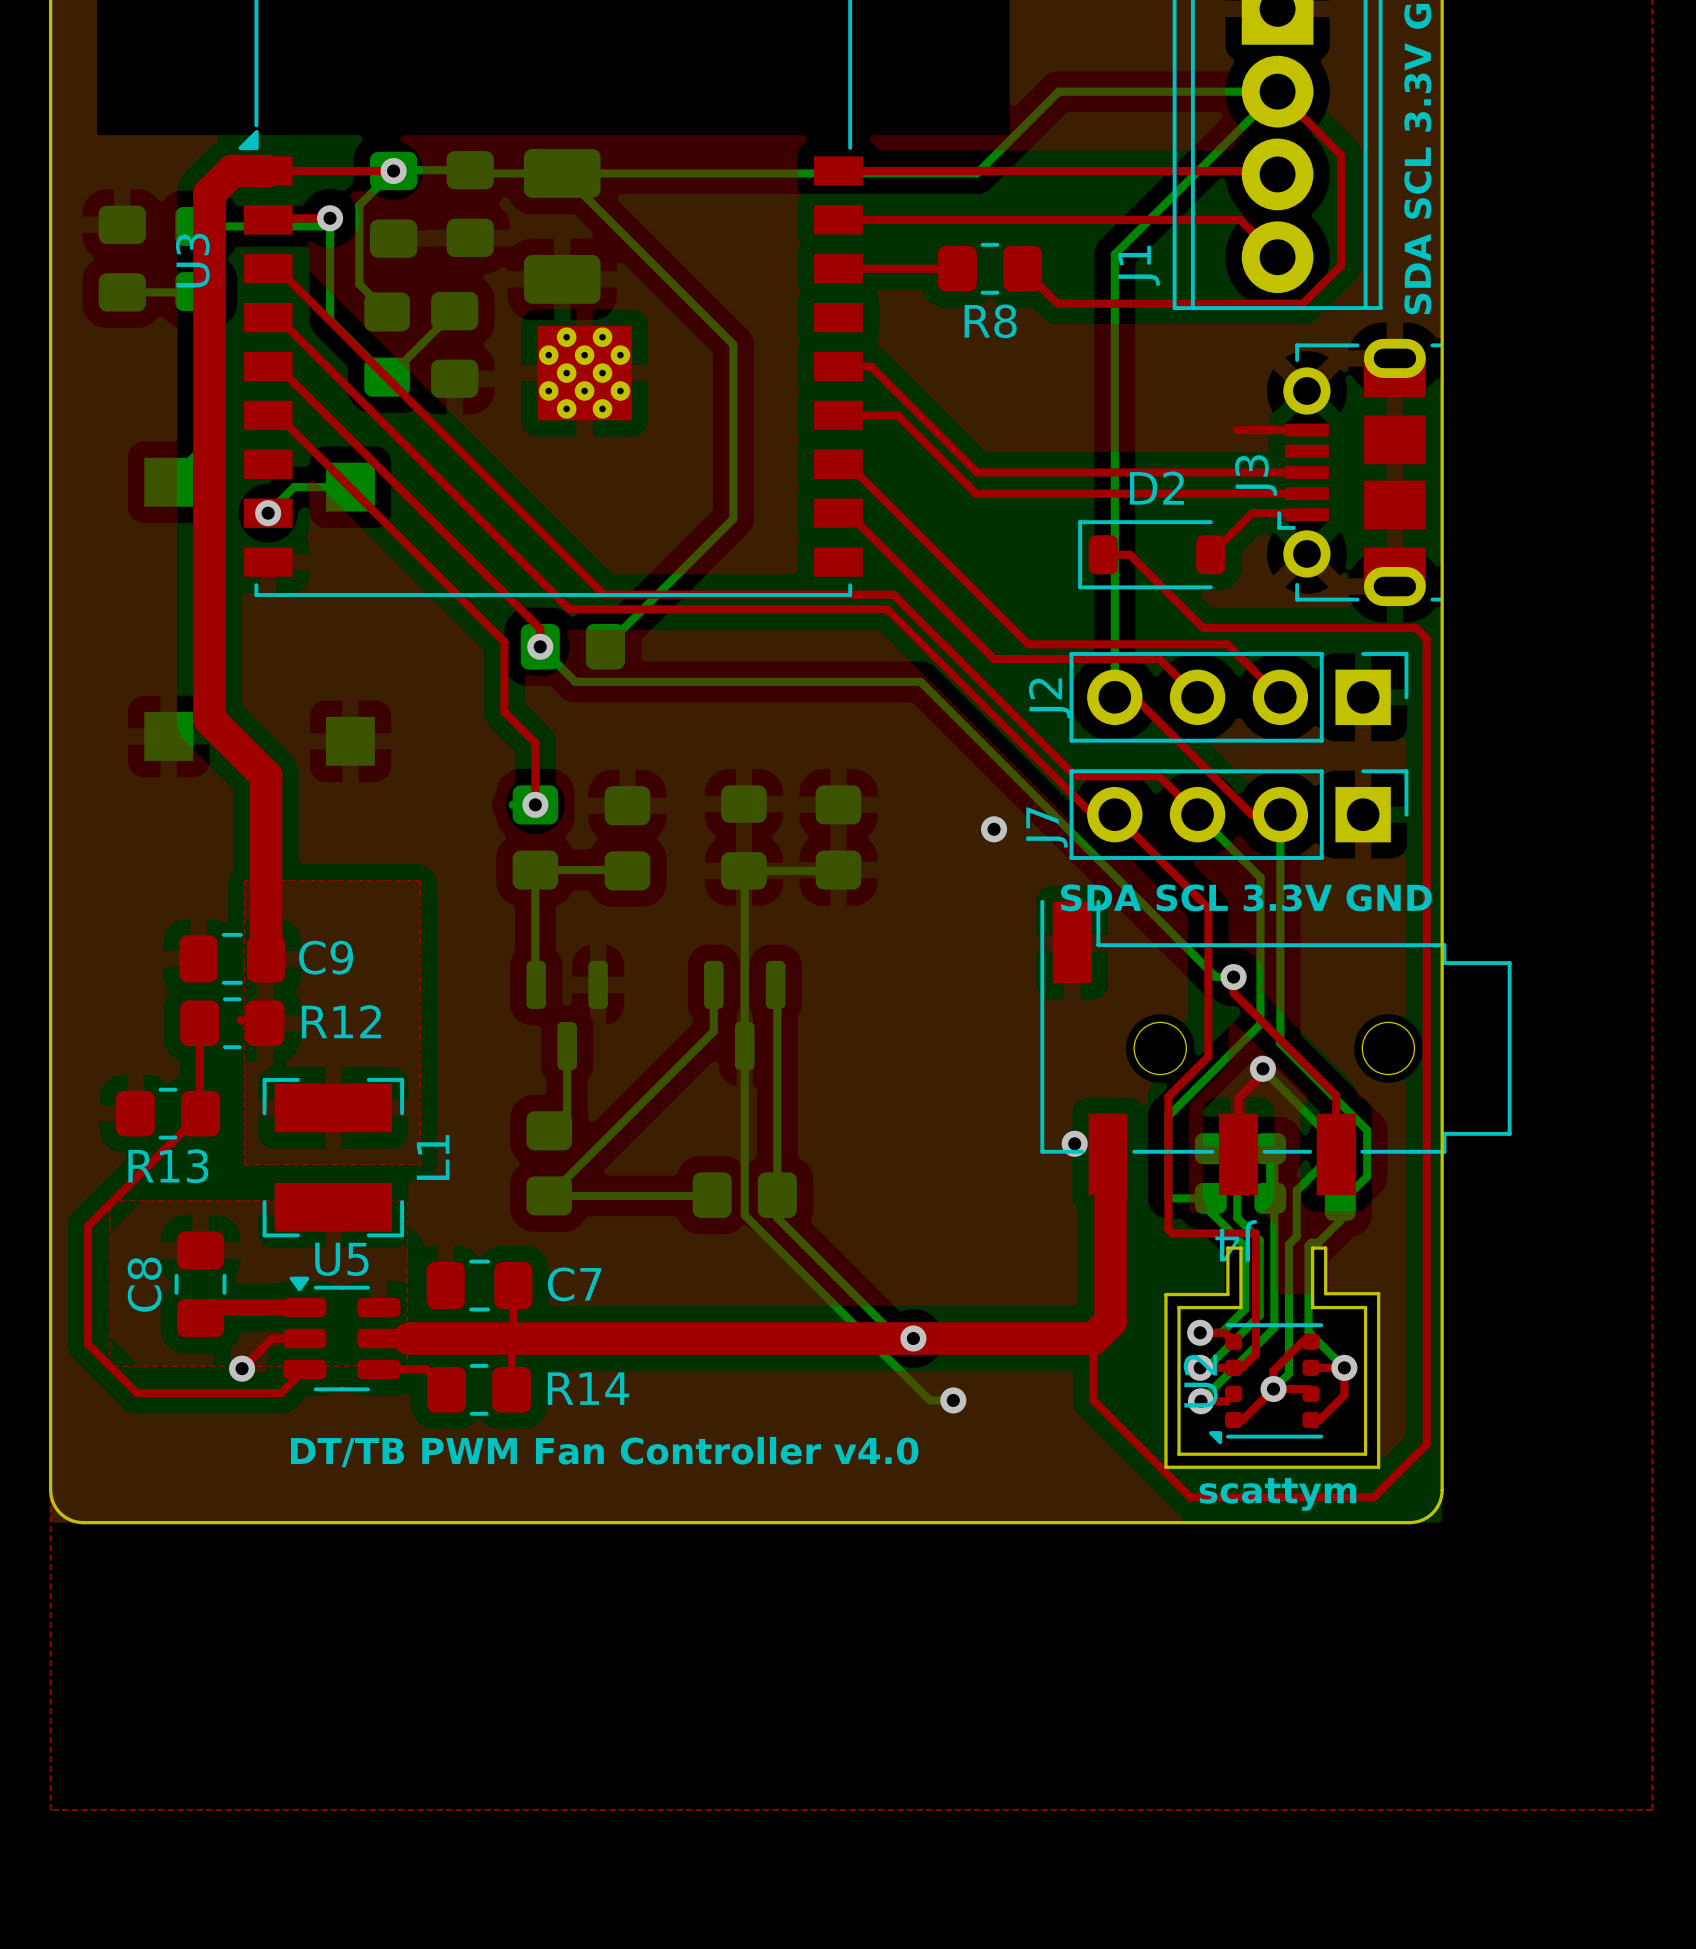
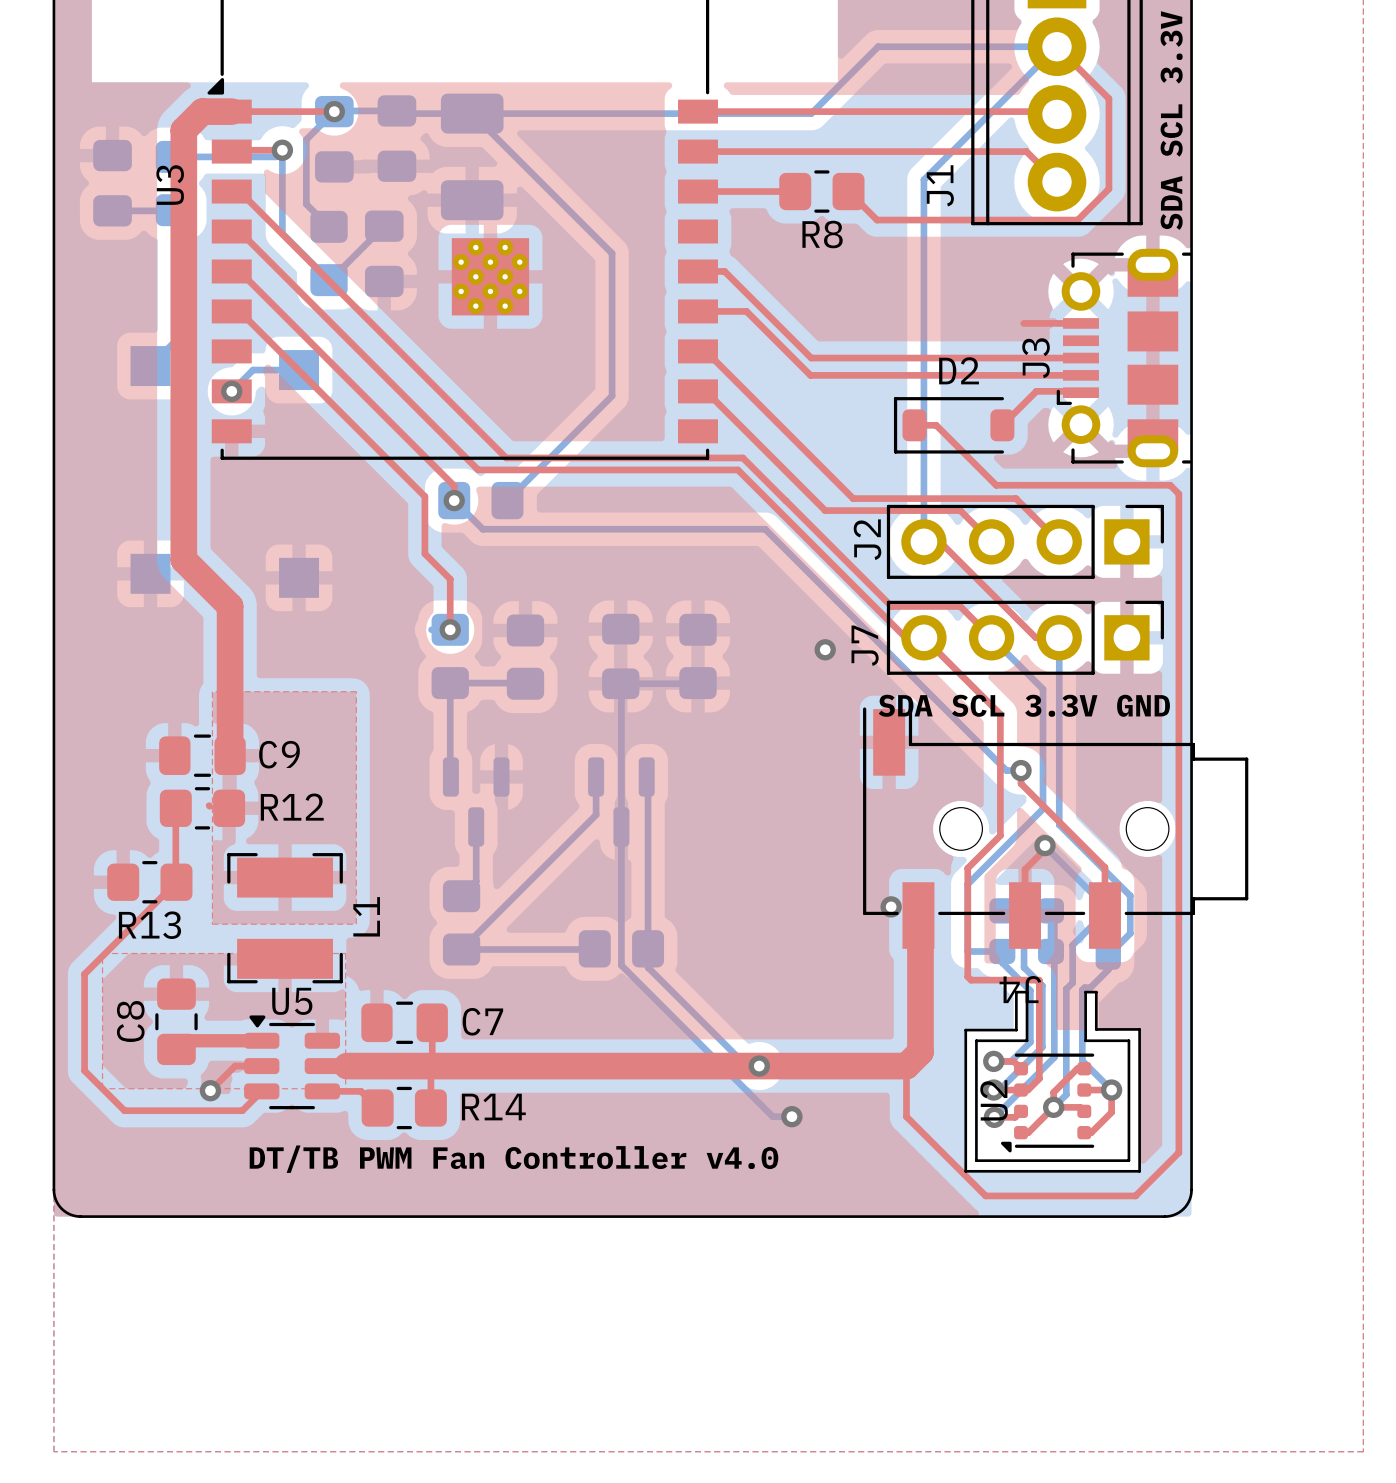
text: scattym (1277, 1494) -> none

